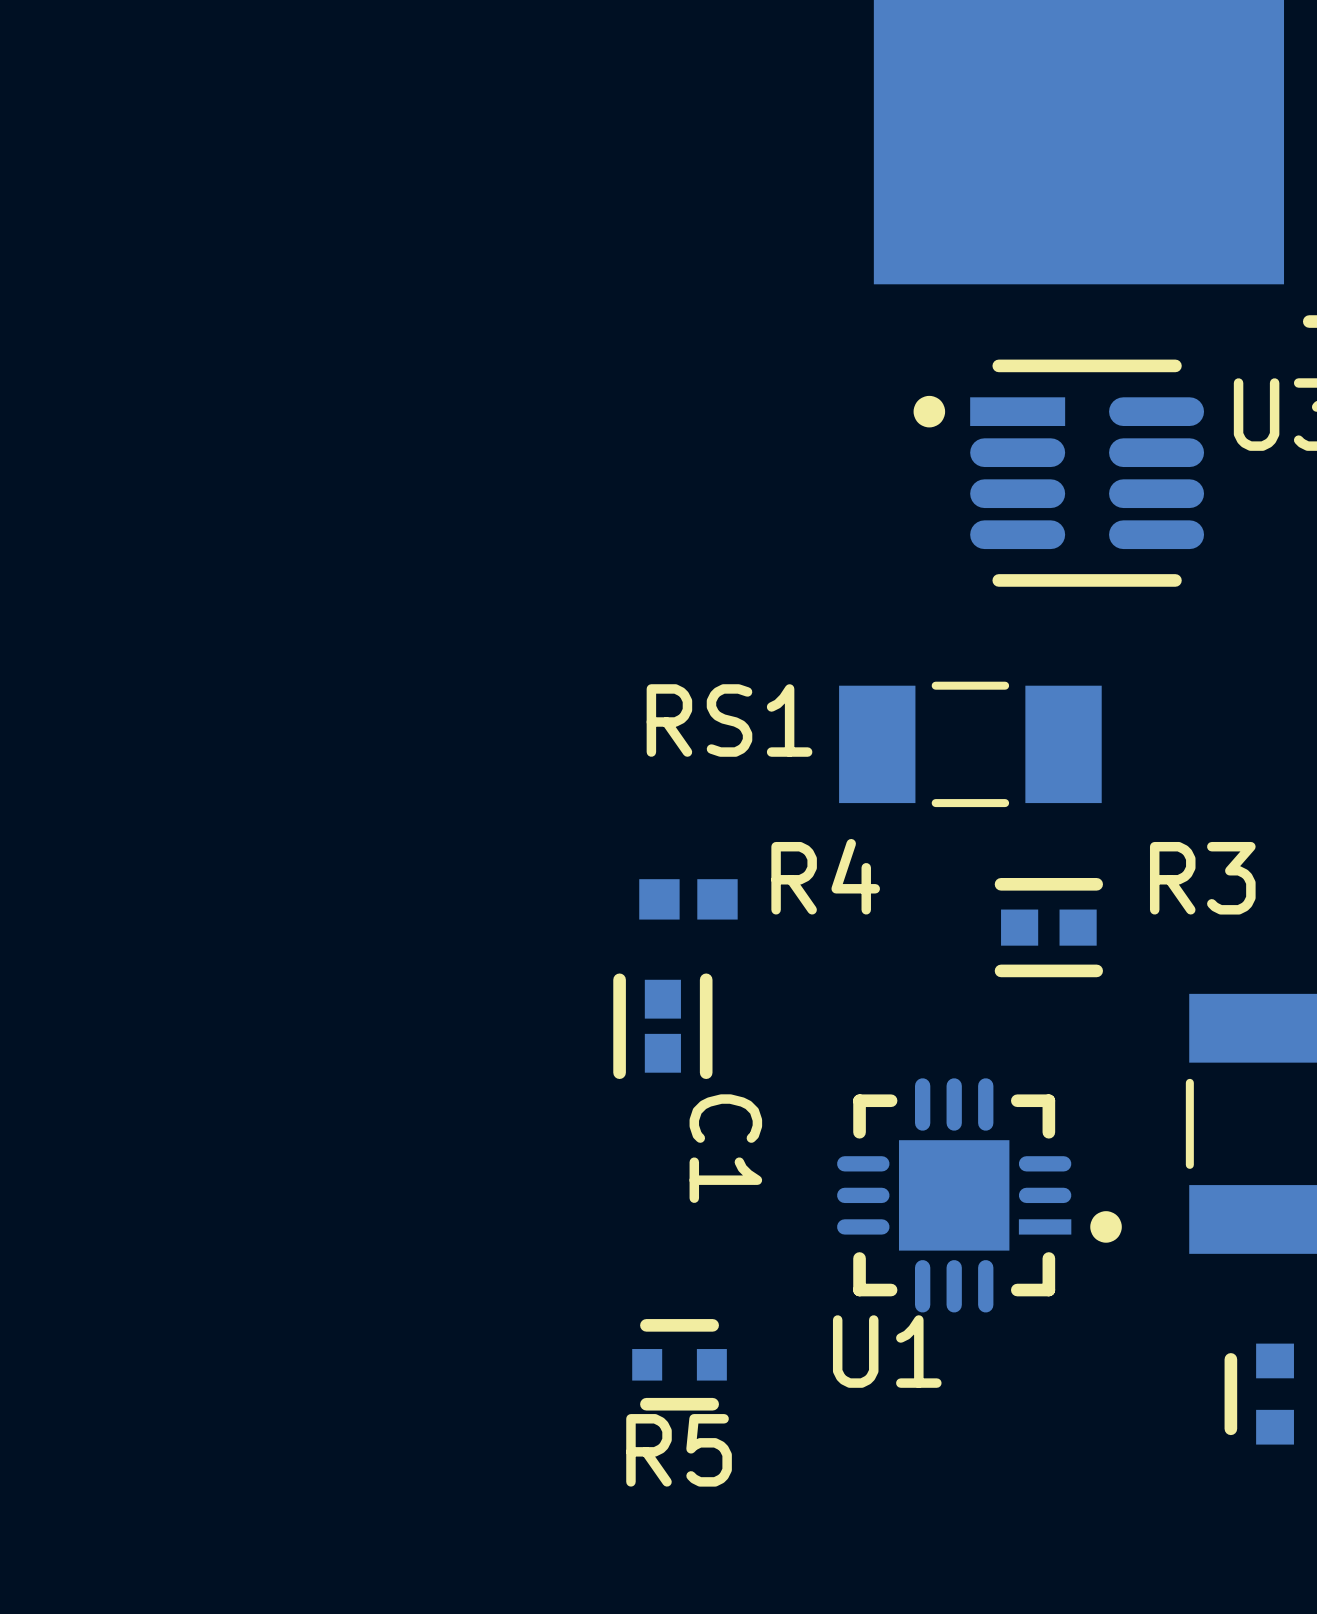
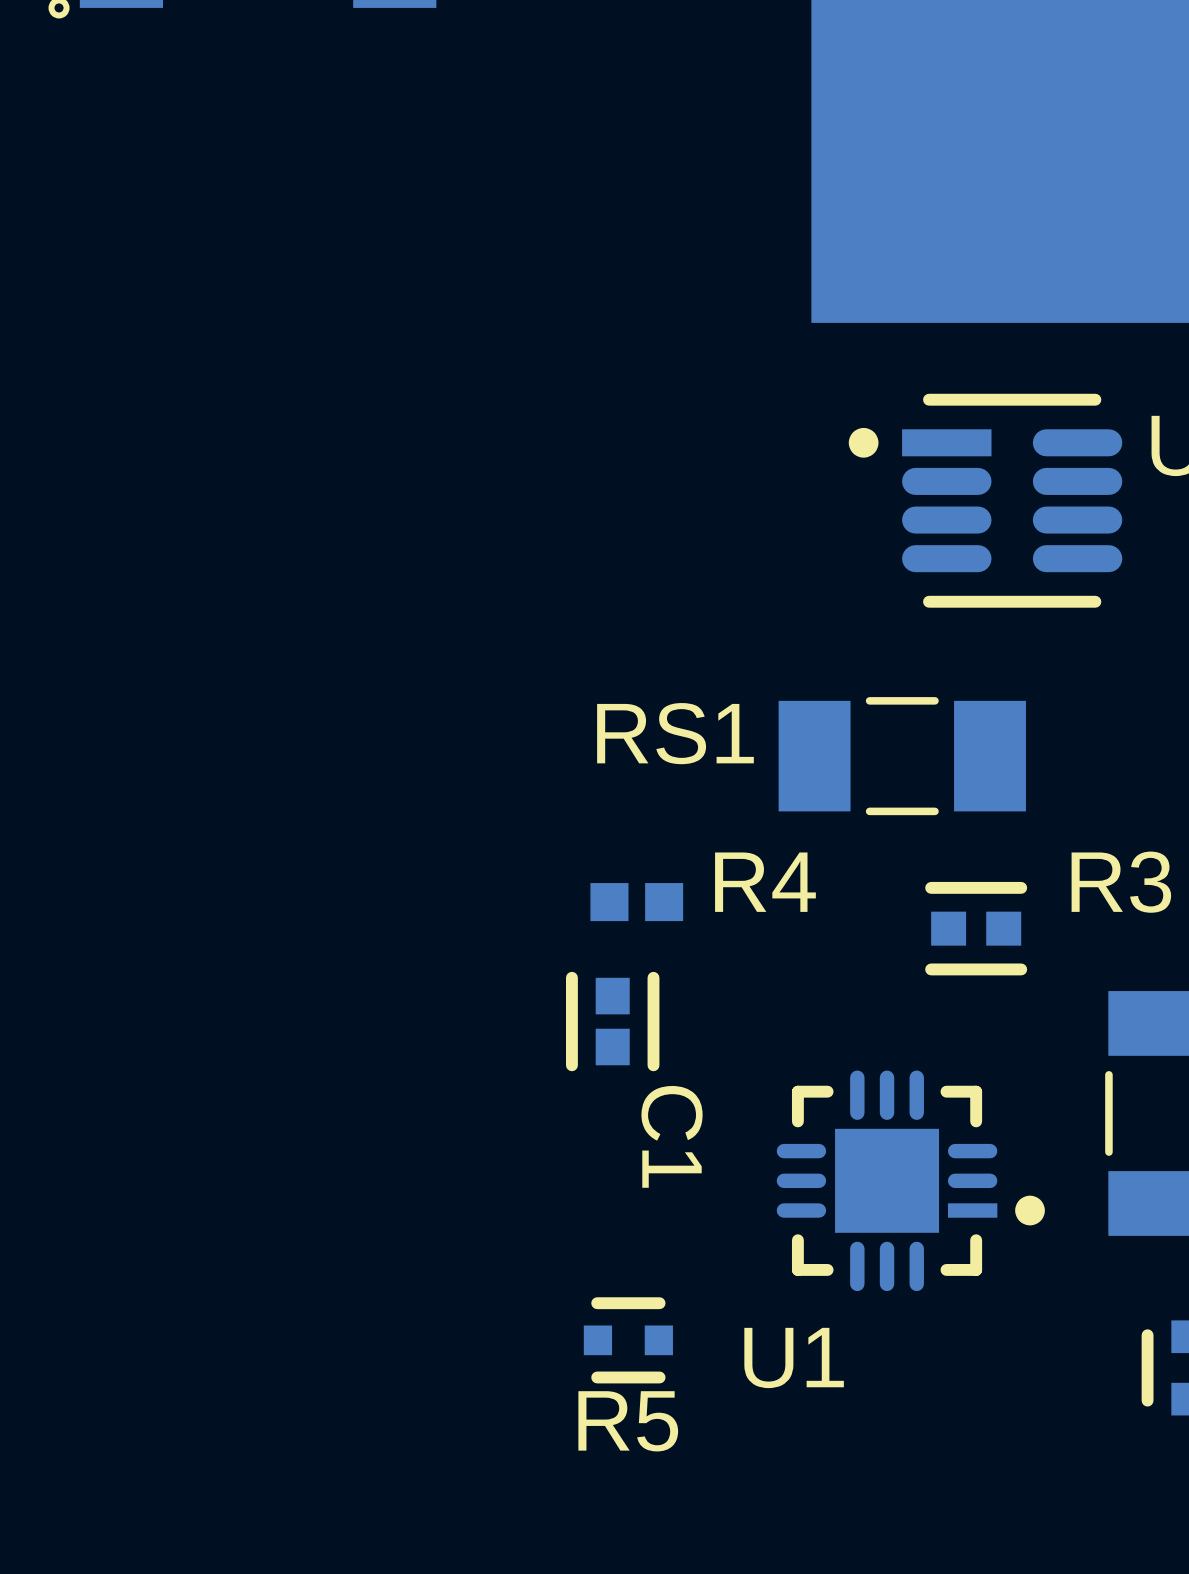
U1 name position: U1 (887, 1351) -> U1 (794, 1357)

